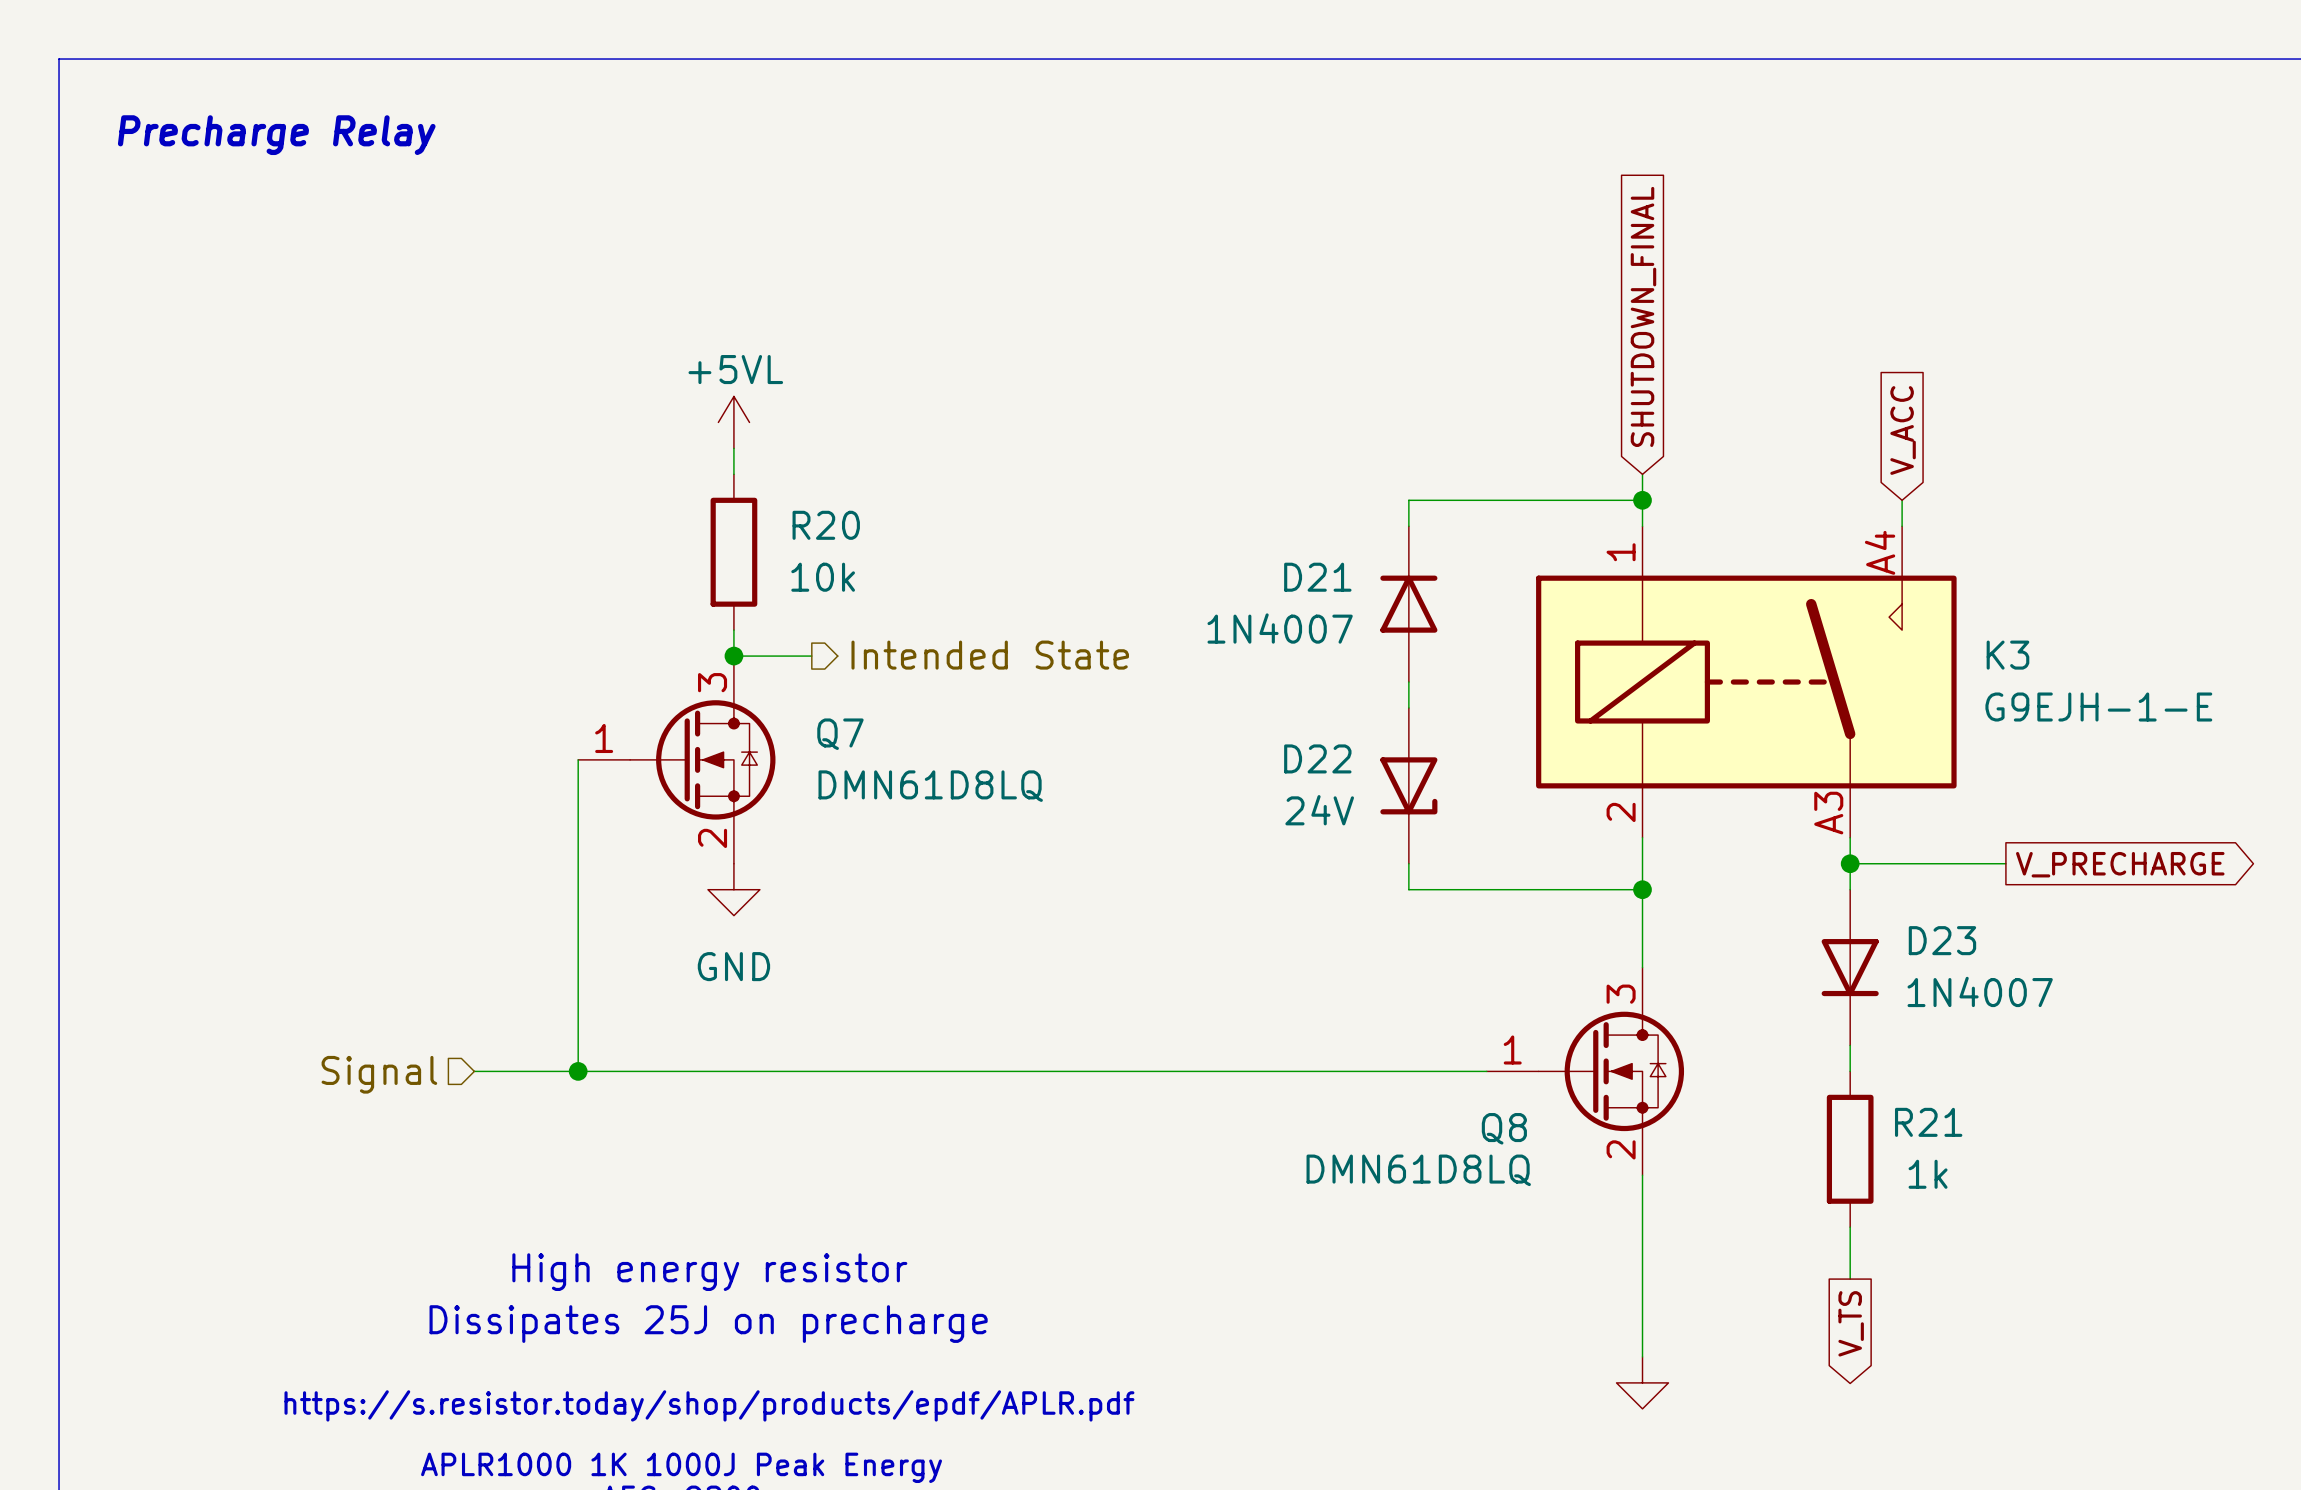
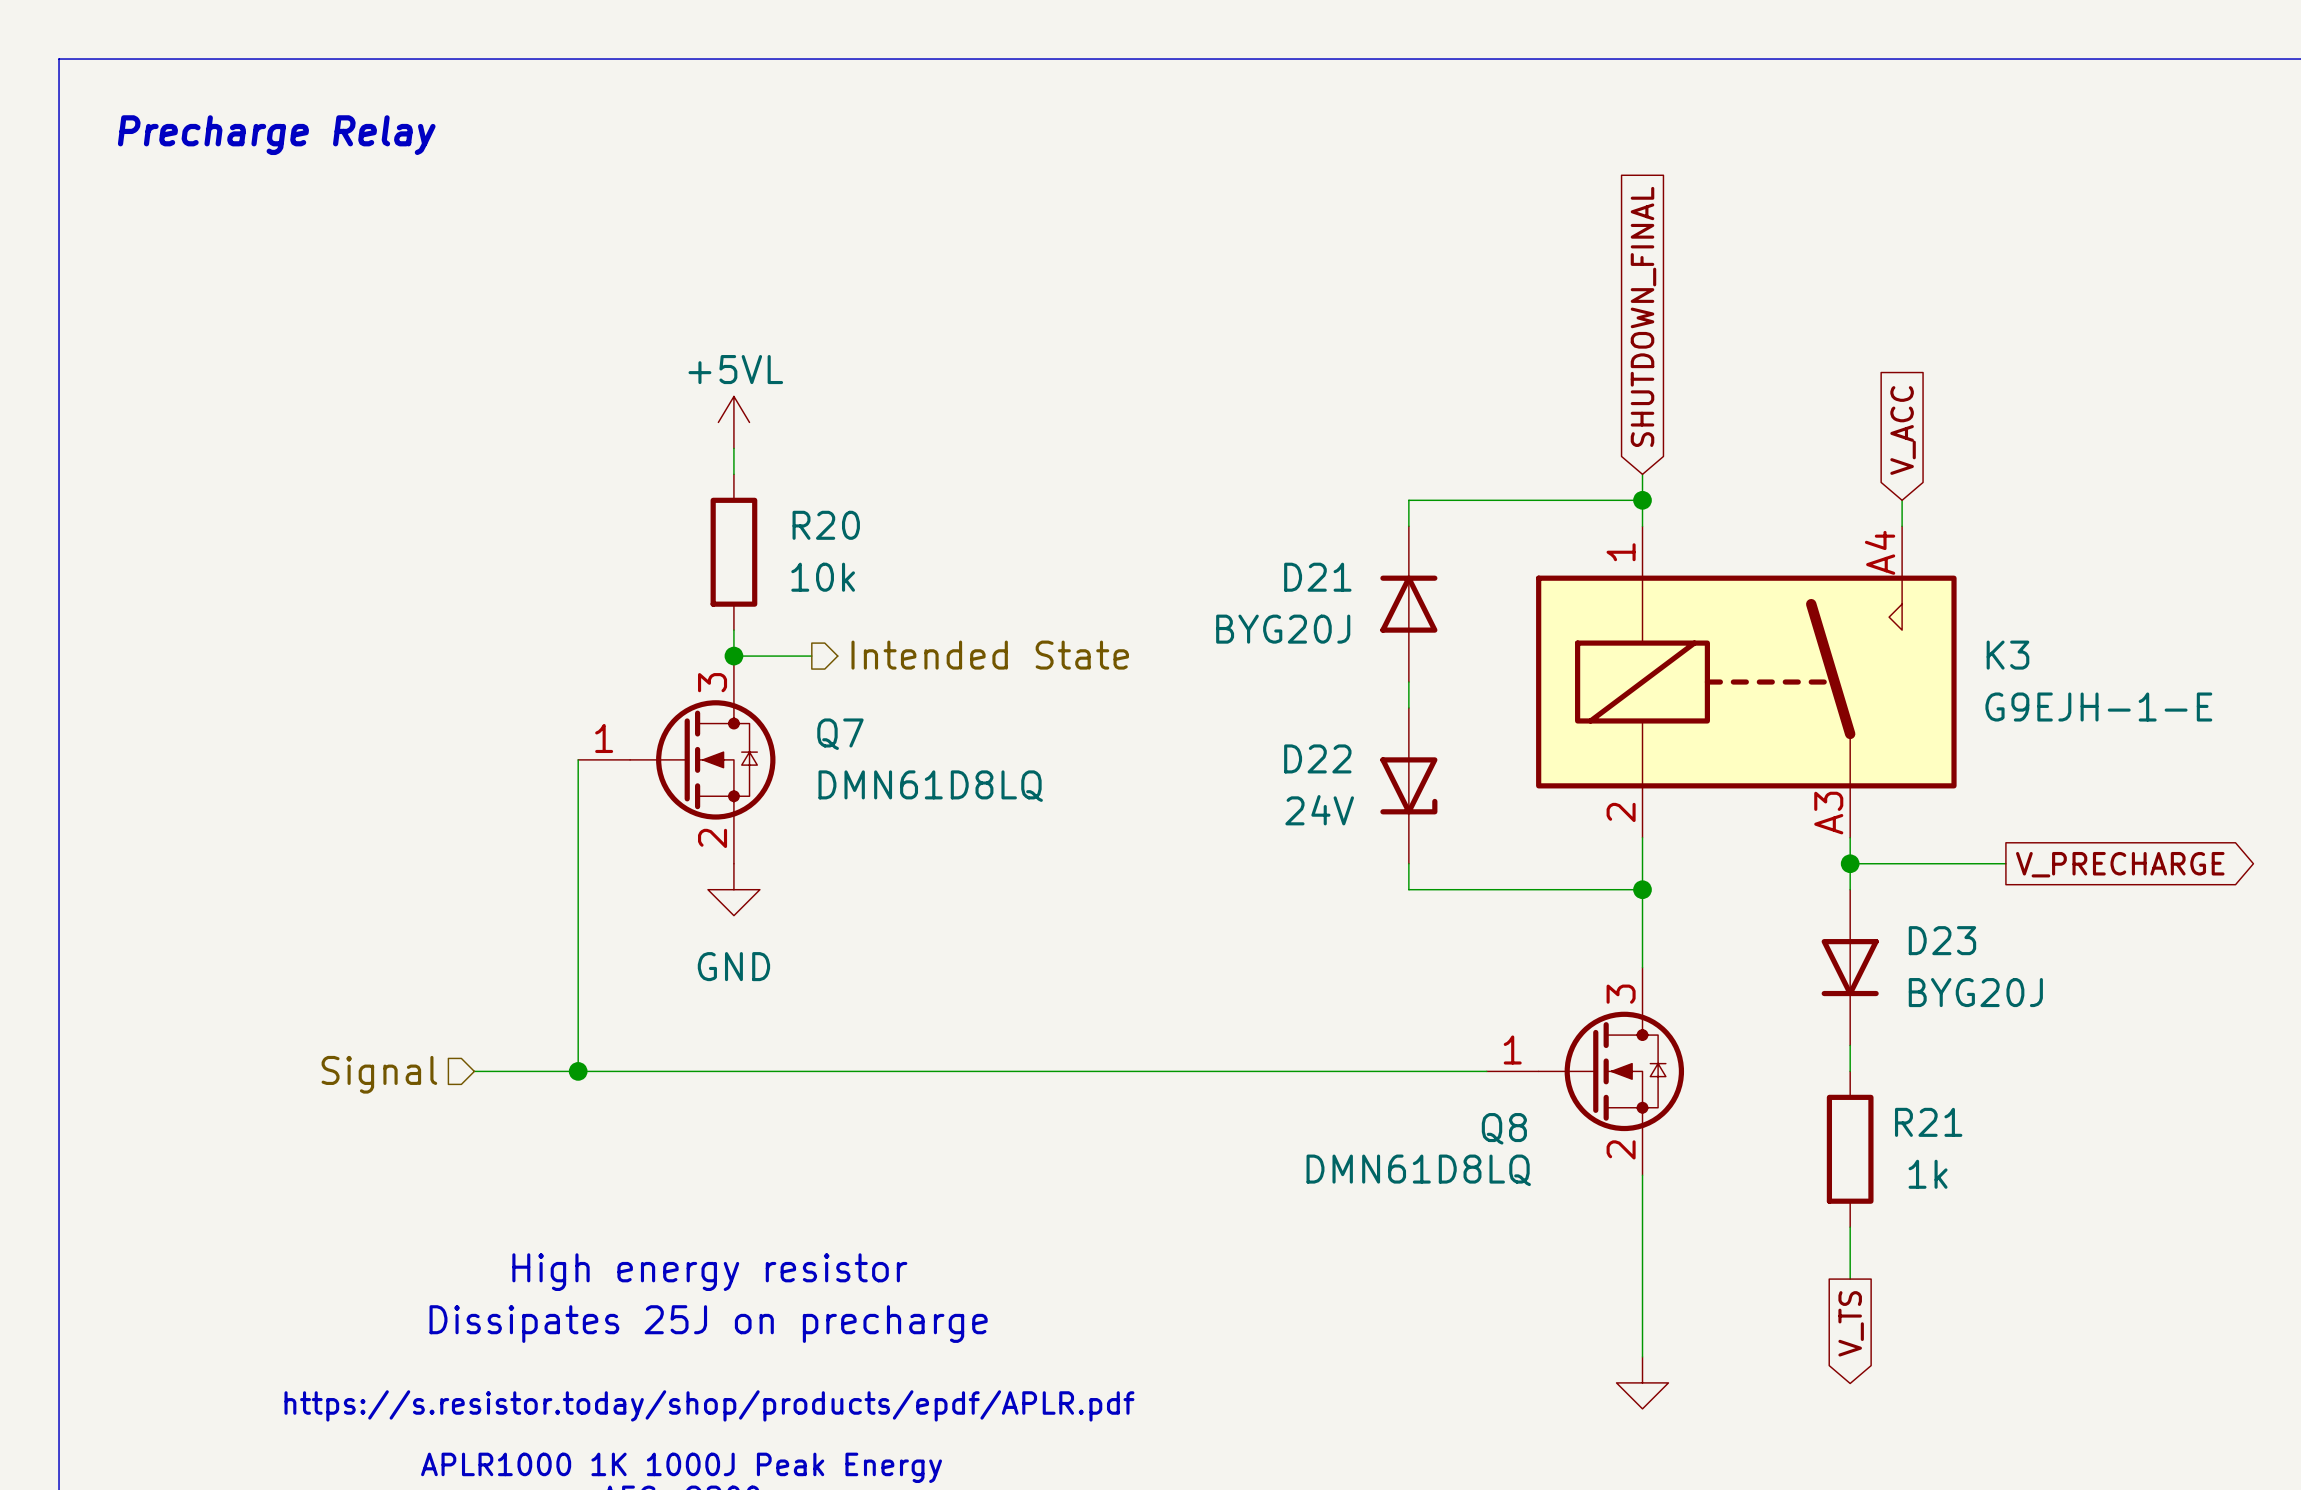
D21 value: 1N4007 (1280, 628) -> BYG20J (1283, 629)
D23 value: 1N4007 (1980, 991) -> BYG20J (1975, 992)

